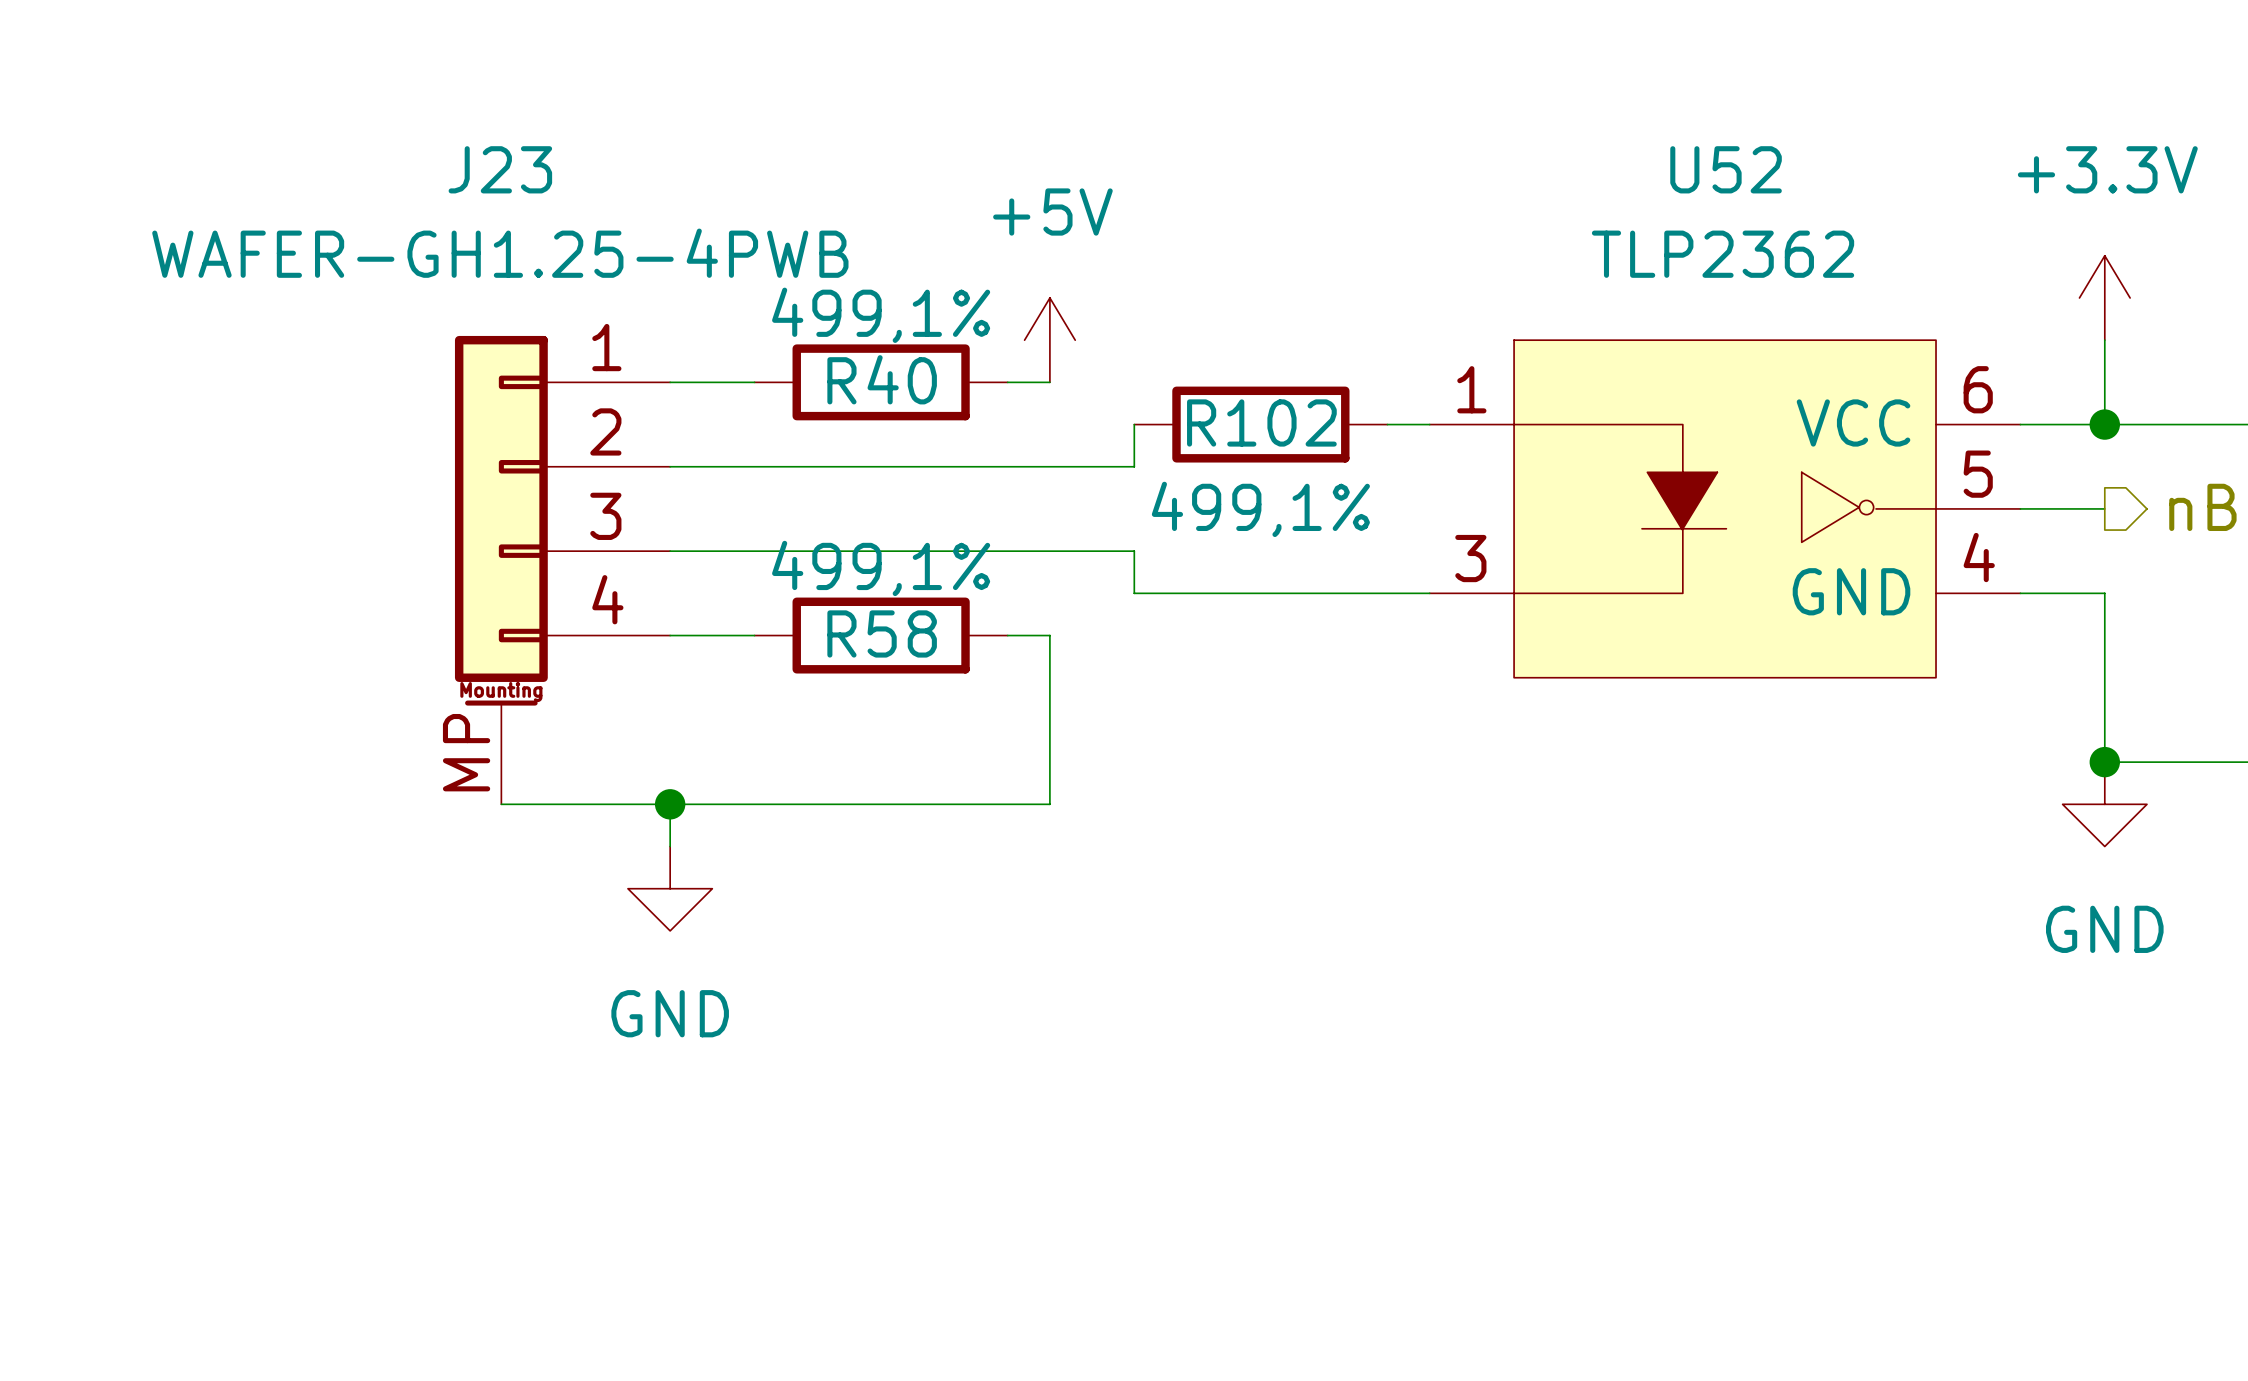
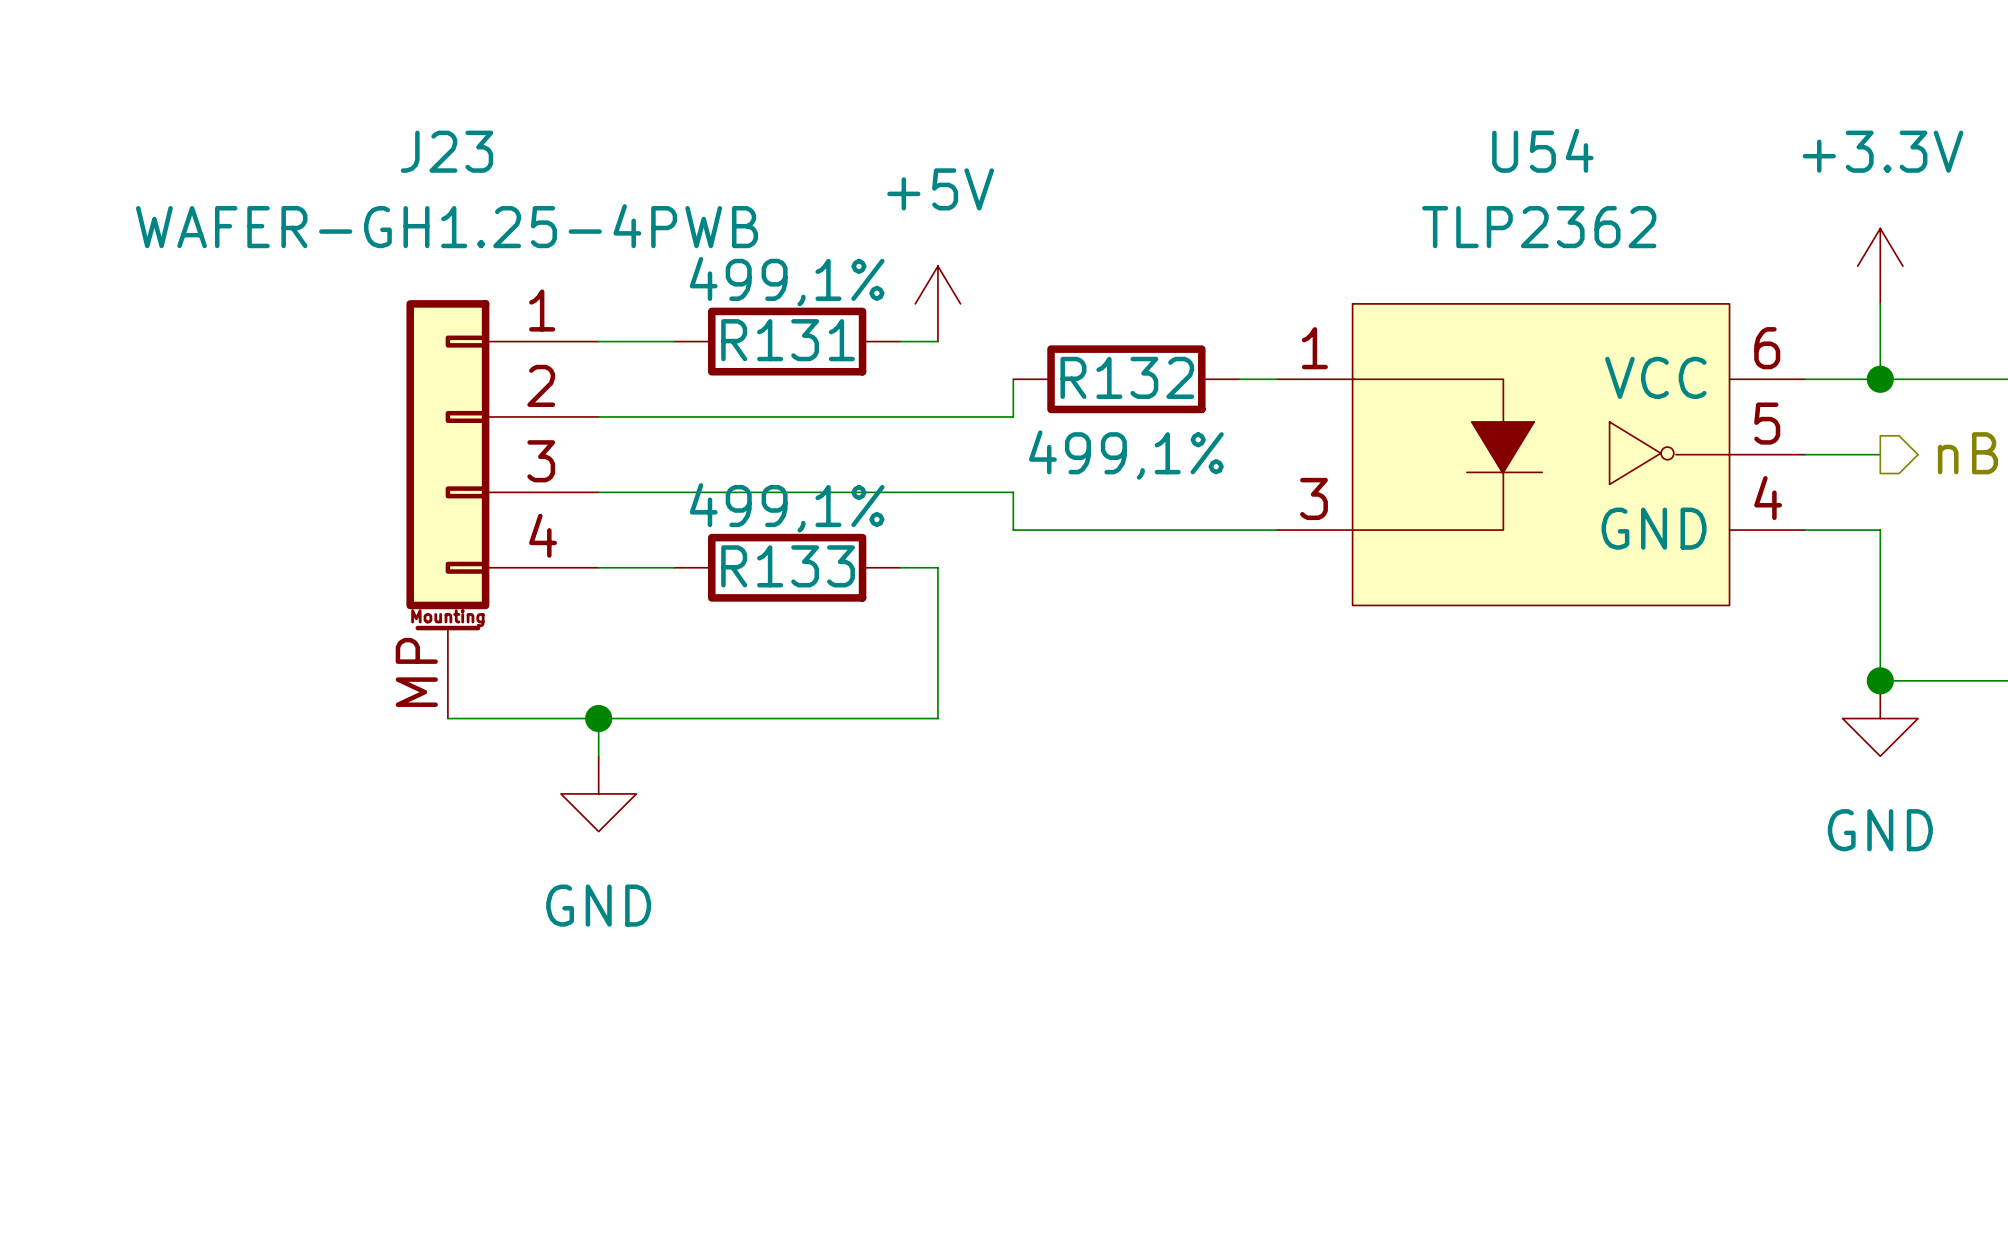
U52 name: U52 (1726, 169) -> U54 (1542, 150)
R40 name: R40 (882, 379) -> R131 (788, 340)
R102 name: R102 (1261, 422) -> R132 (1127, 377)
R58 name: R58 (882, 633) -> R133 (788, 566)

